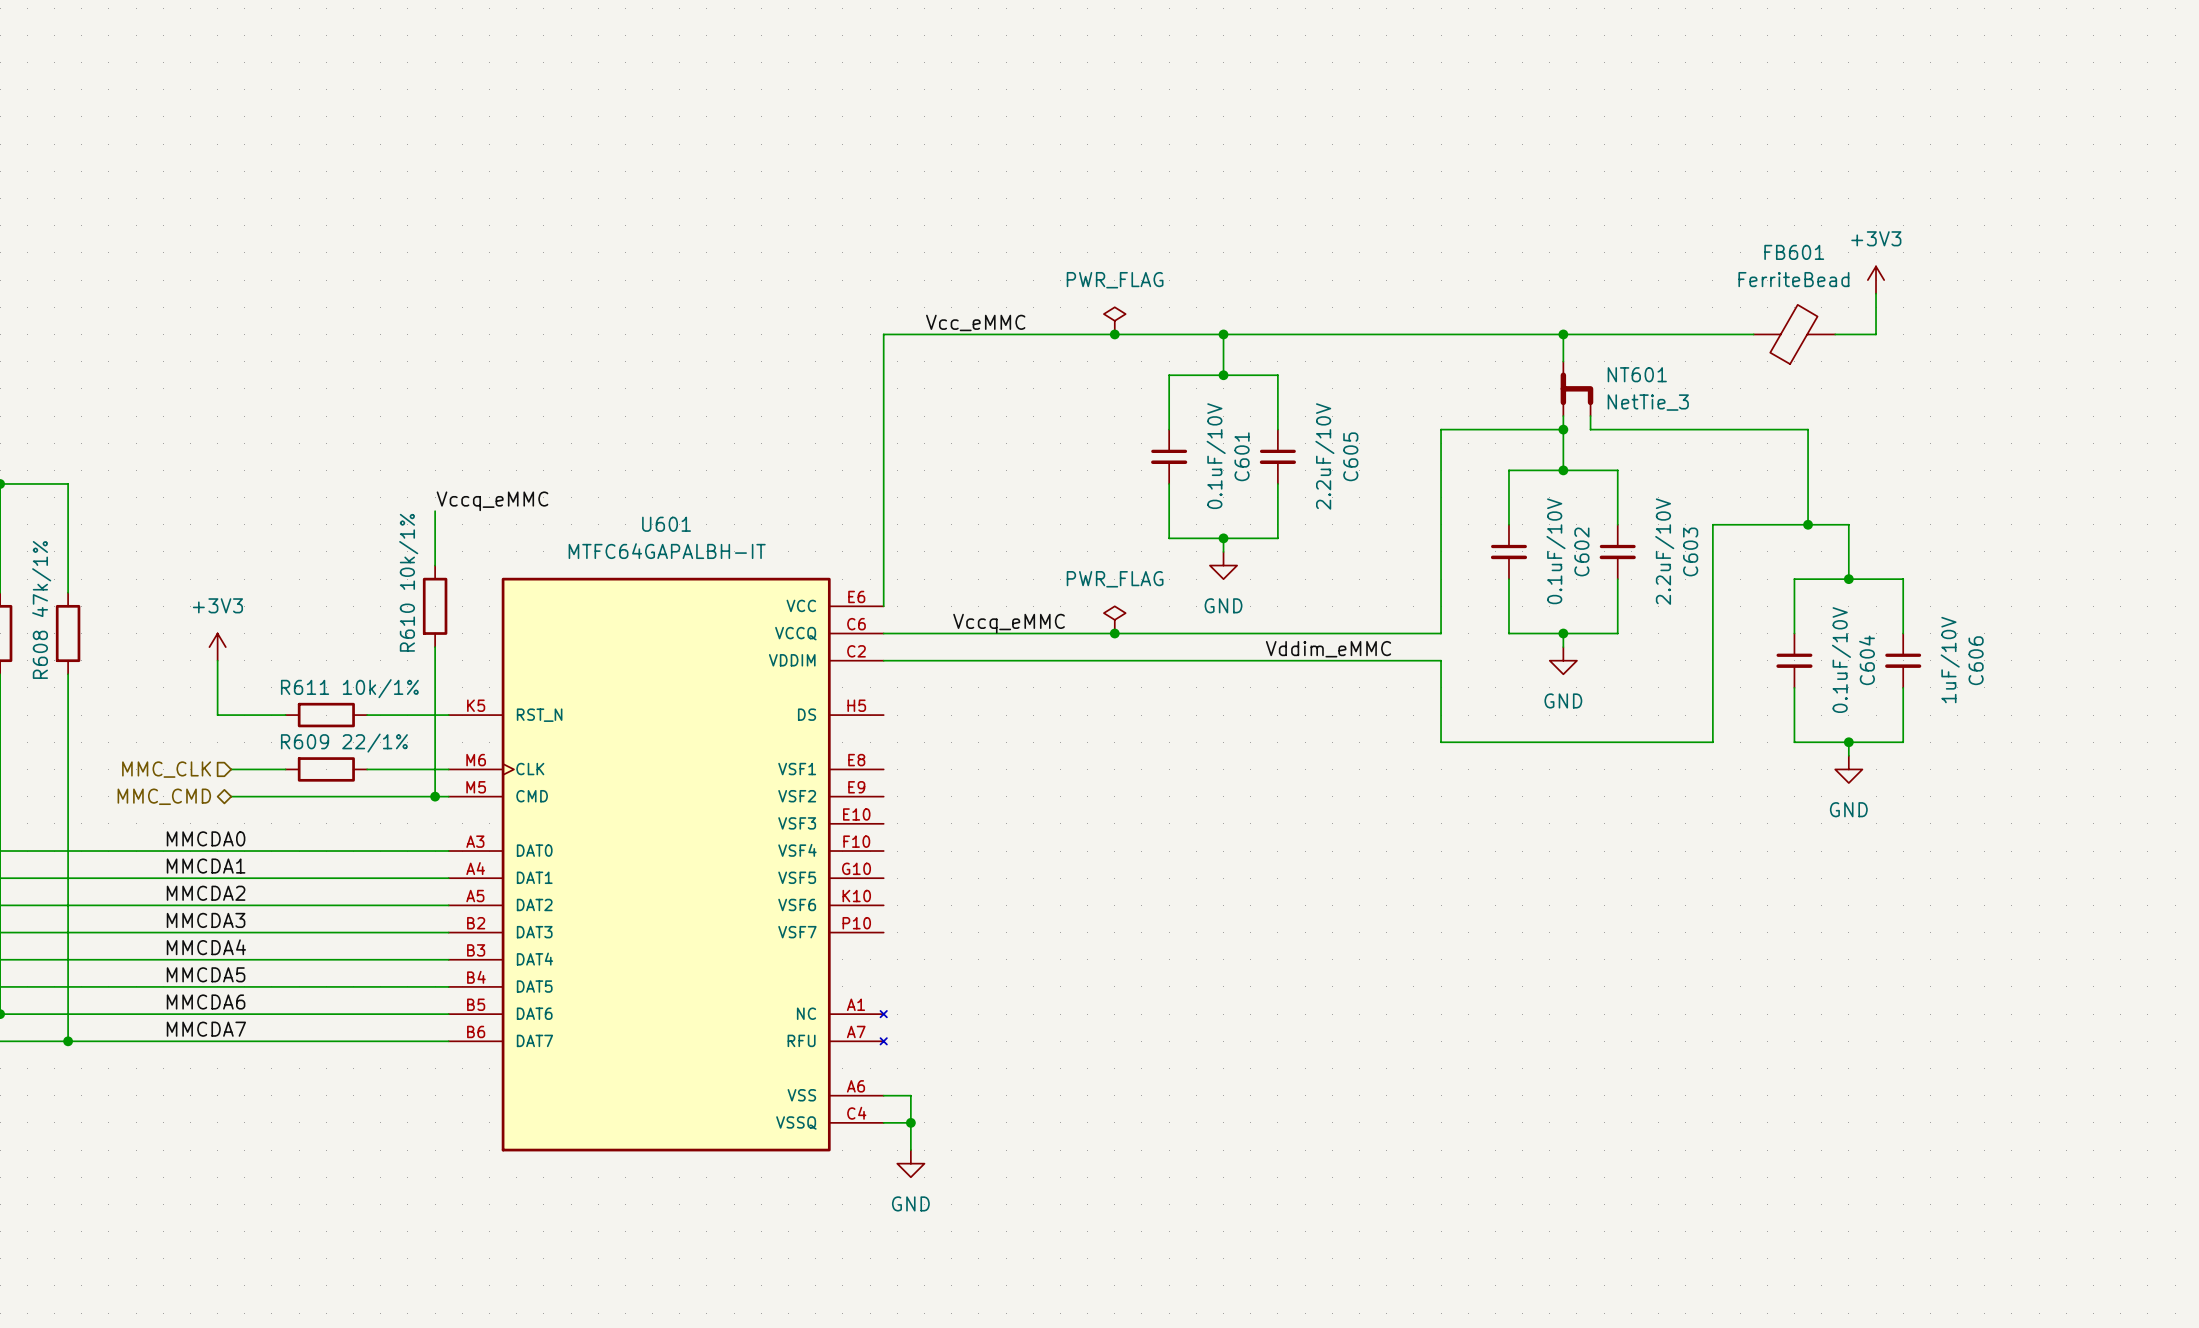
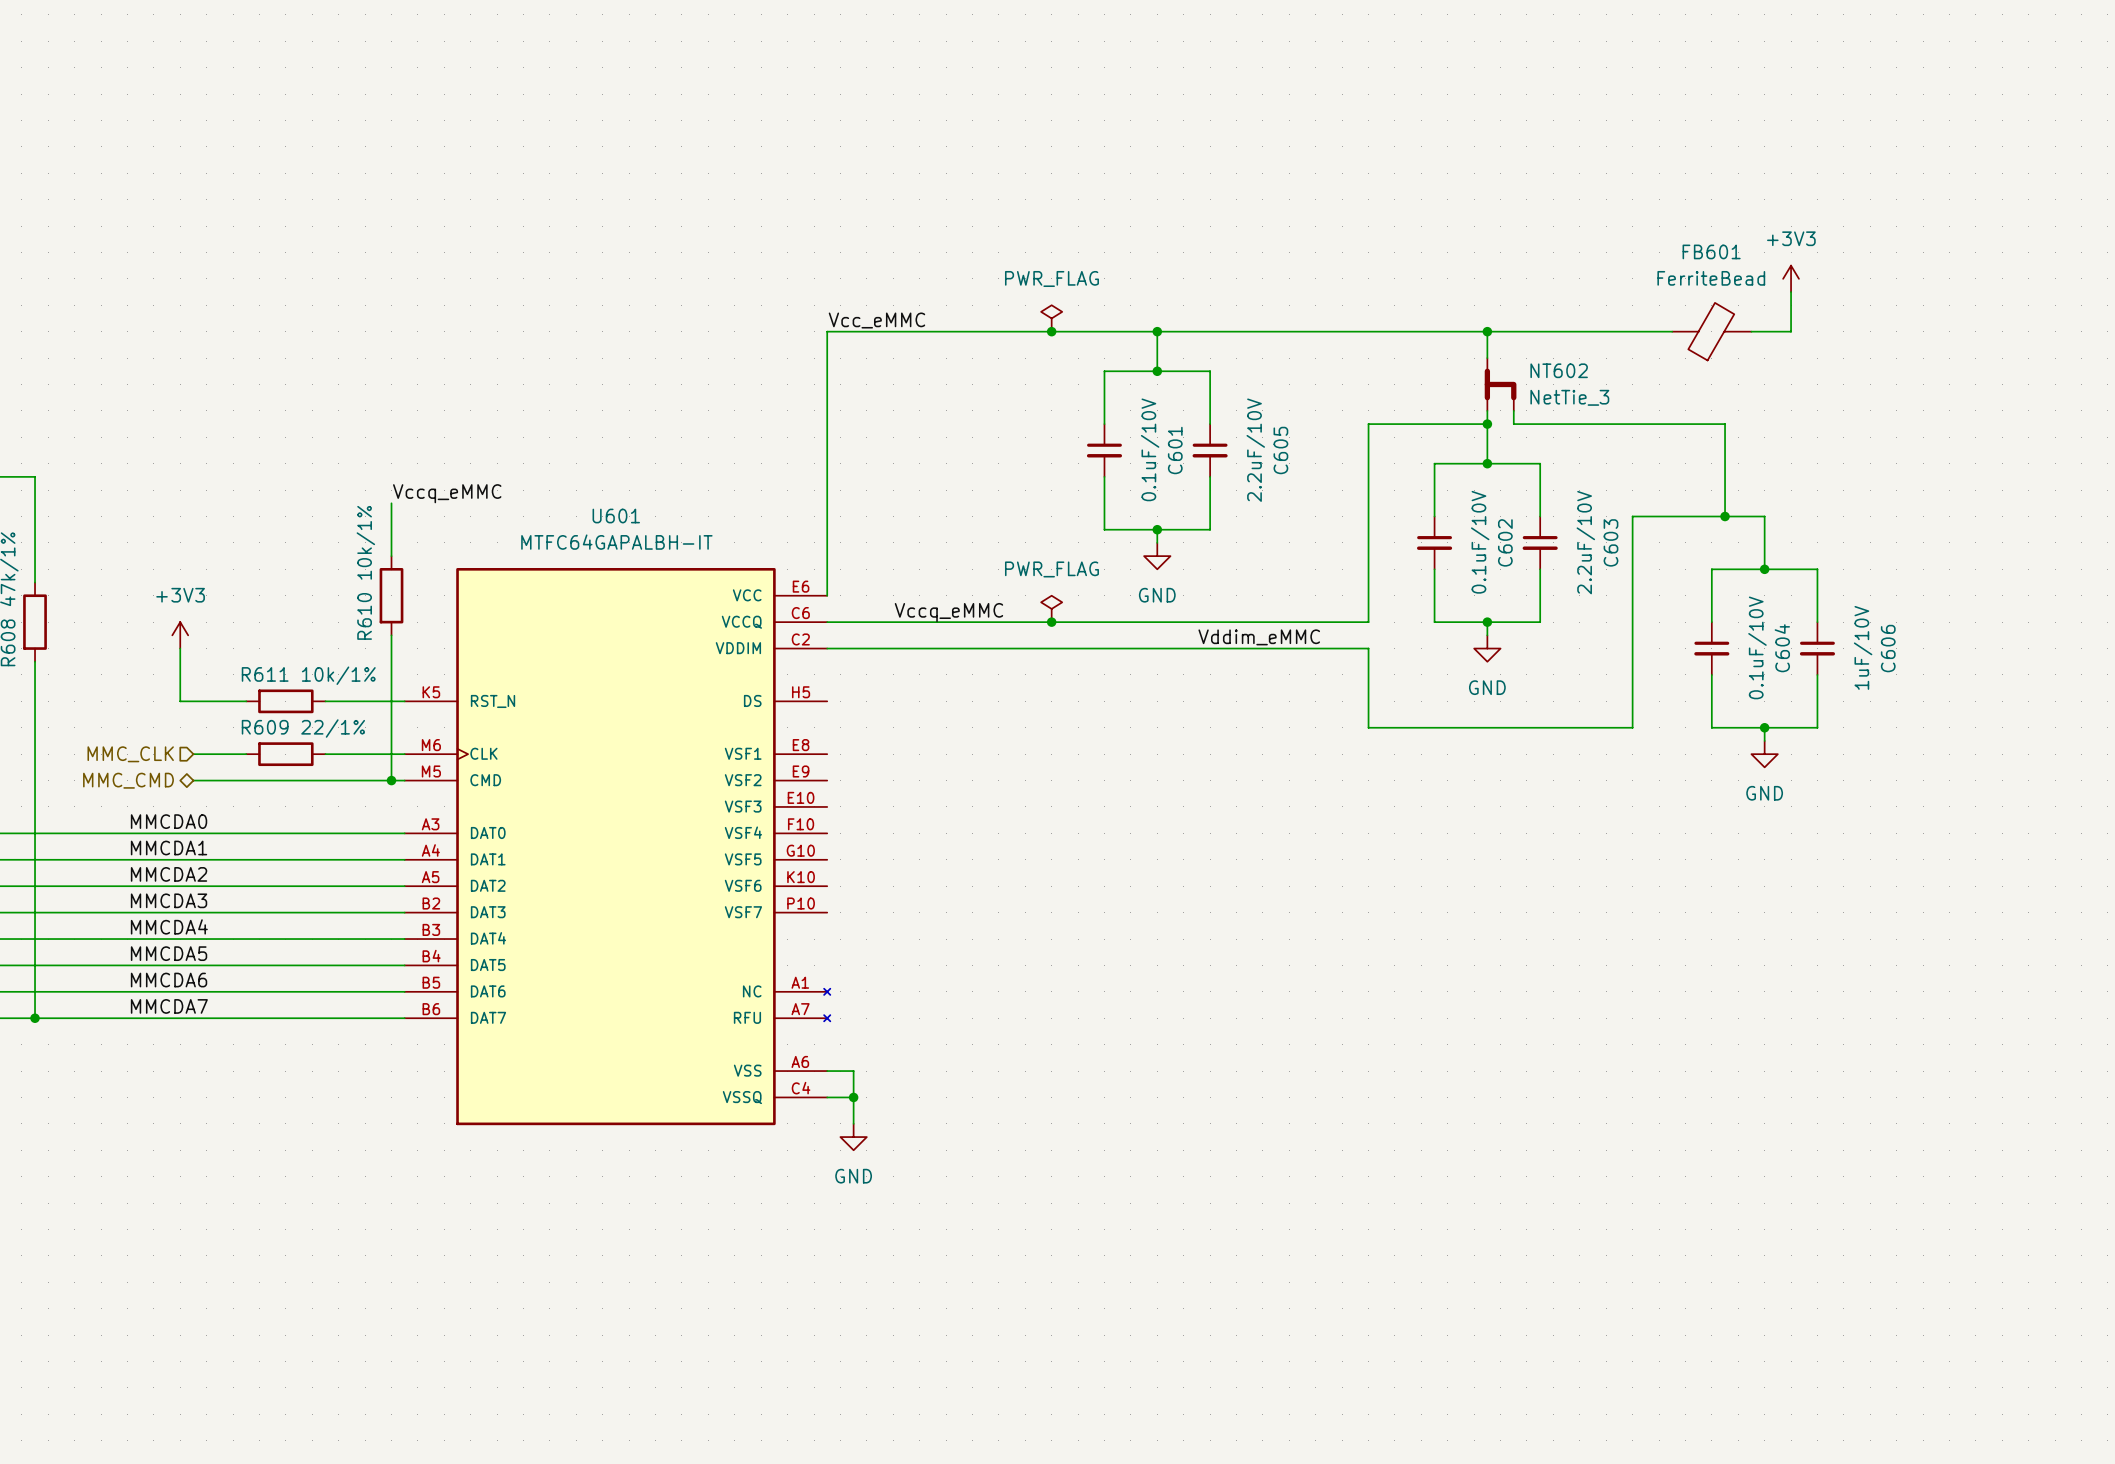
label position: Vcc_eMMC (975, 322) -> Vcc_eMMC (876, 320)
NT601 name: NT601 (1637, 374) -> NT602 (1559, 370)

